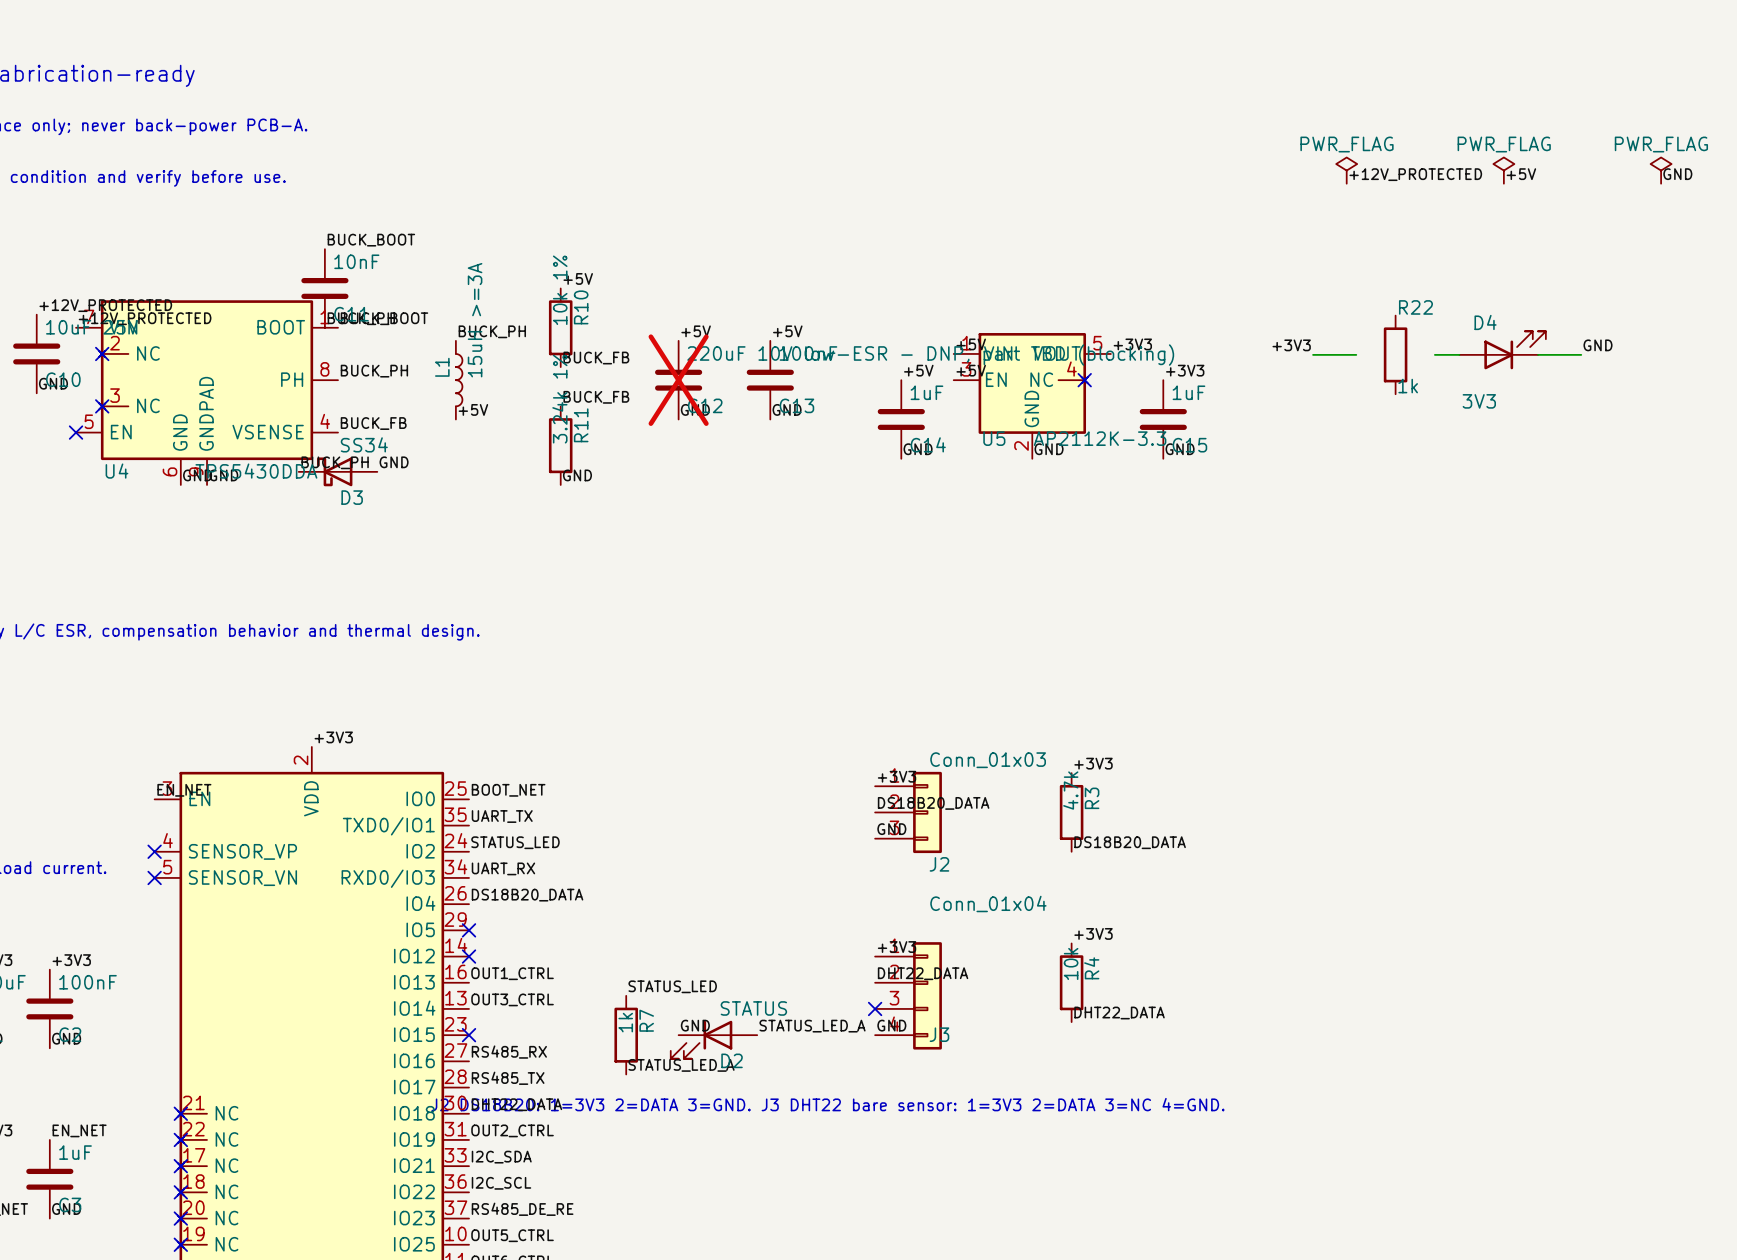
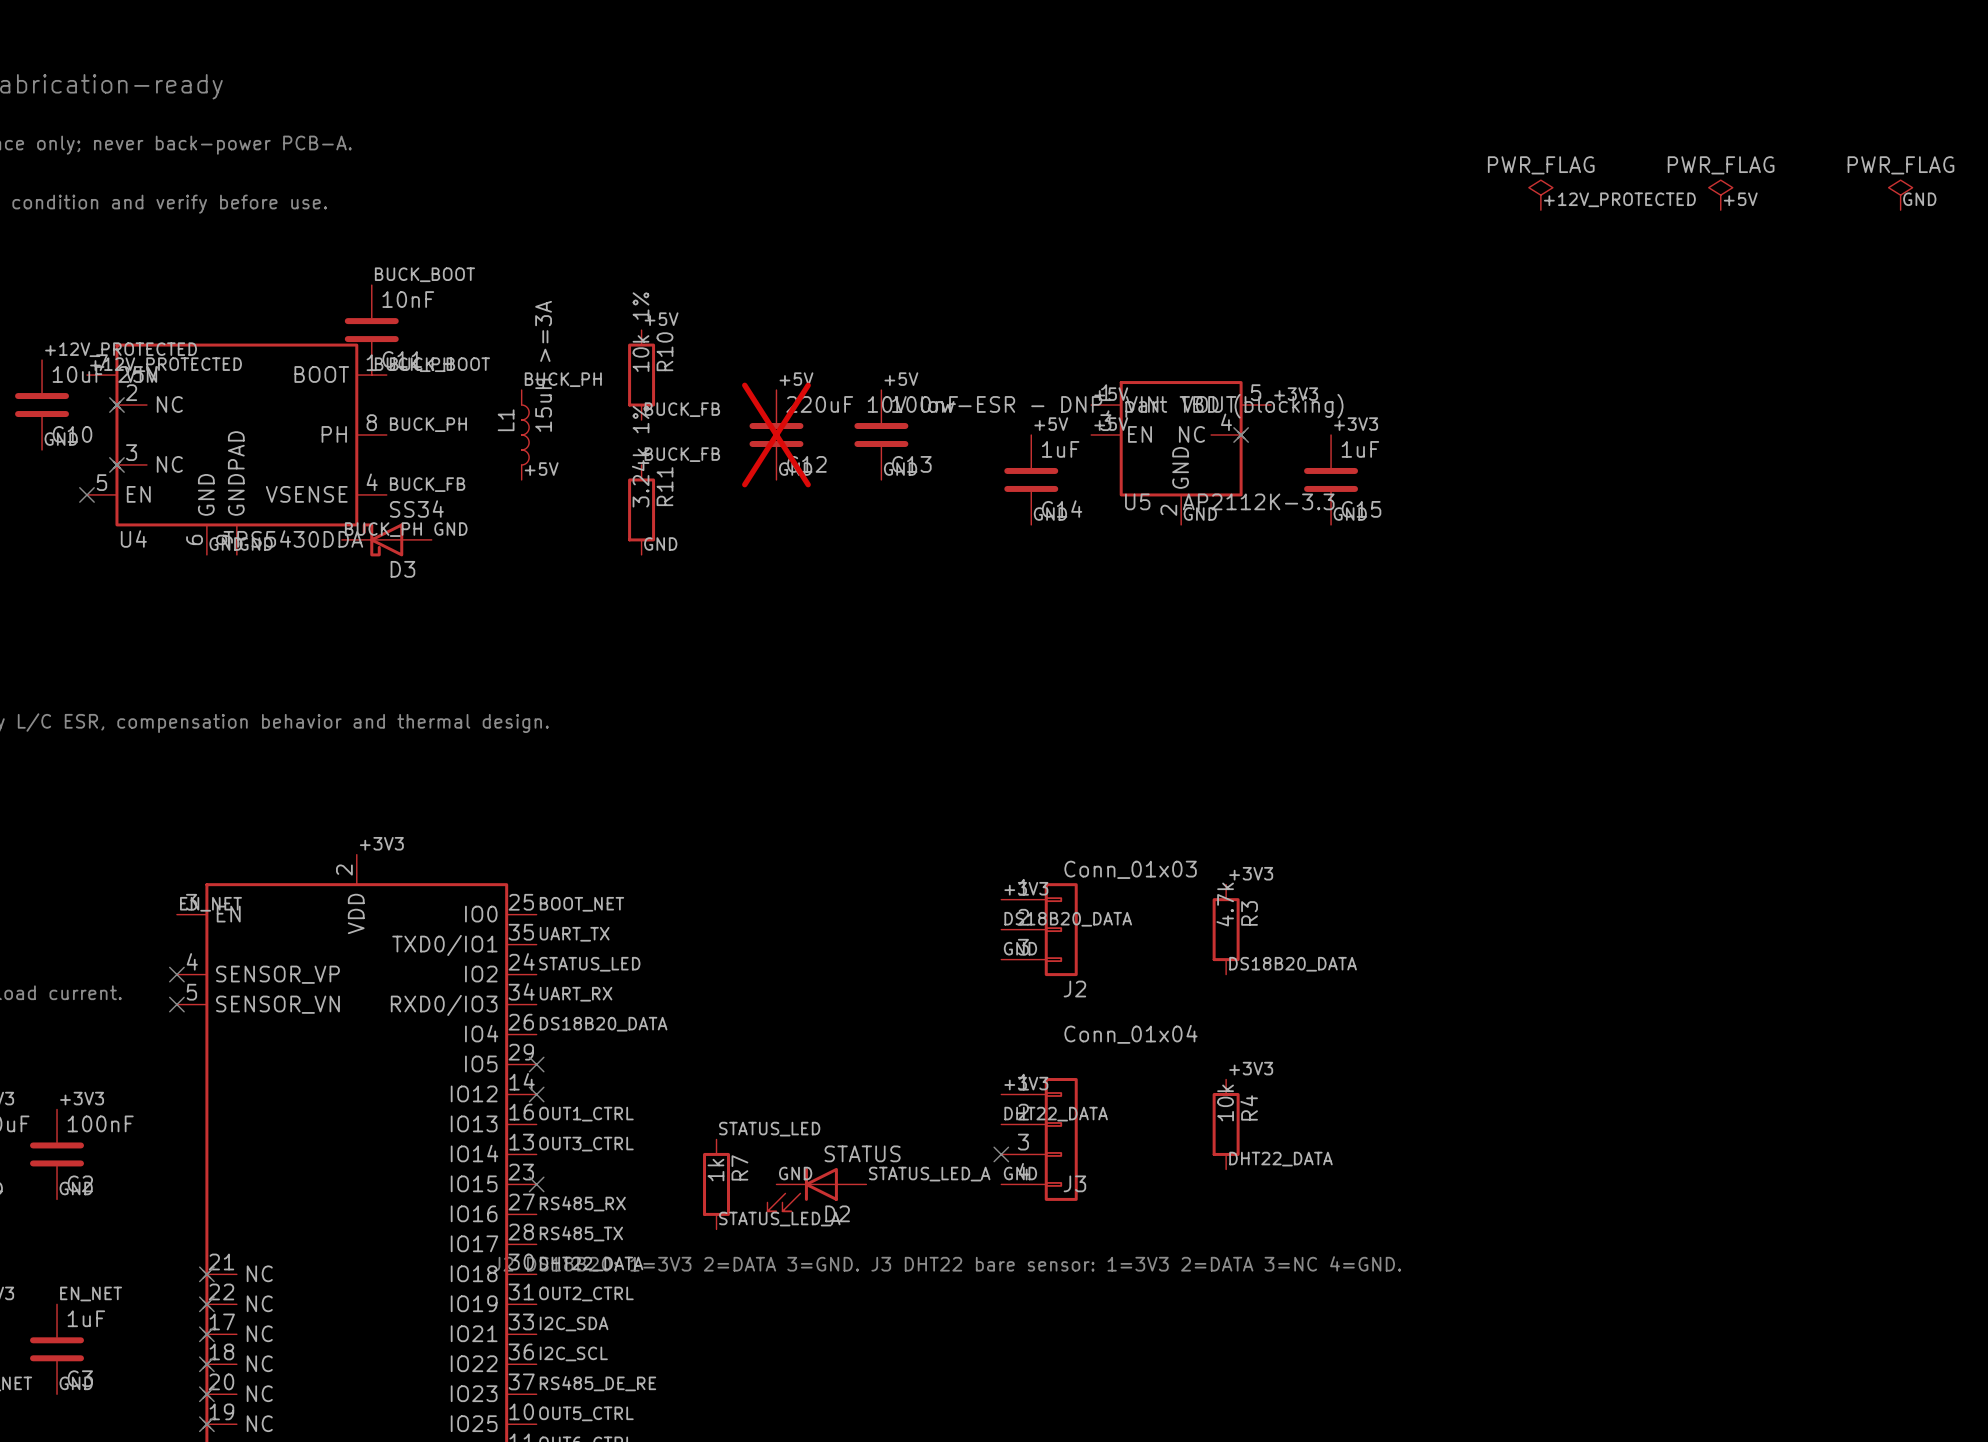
label: +3V3 (1291, 345) -> none
label: GND (1598, 345) -> none
D4: 3V3 (1502, 350) -> none
wire: (1313, 354) (1356, 354) -> none
R22: 1k (1395, 354) -> none
wire: (1434, 354) (1459, 354) -> none
wire: (1538, 354) (1581, 354) -> none

